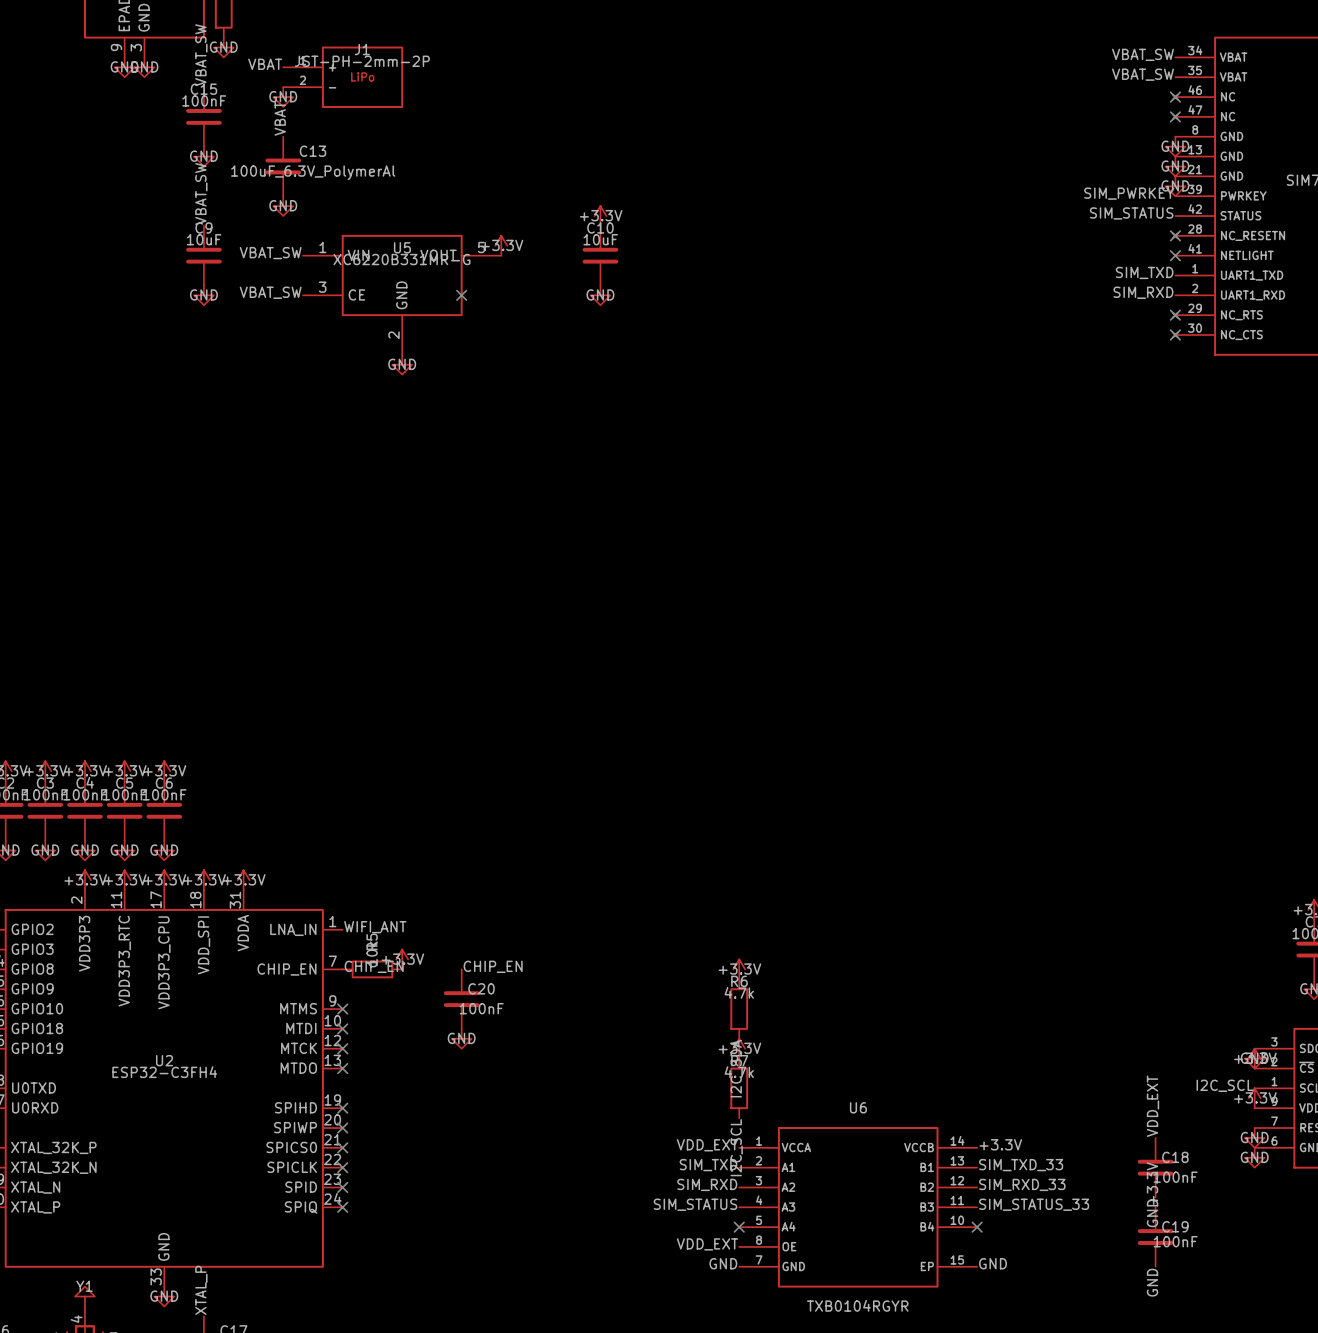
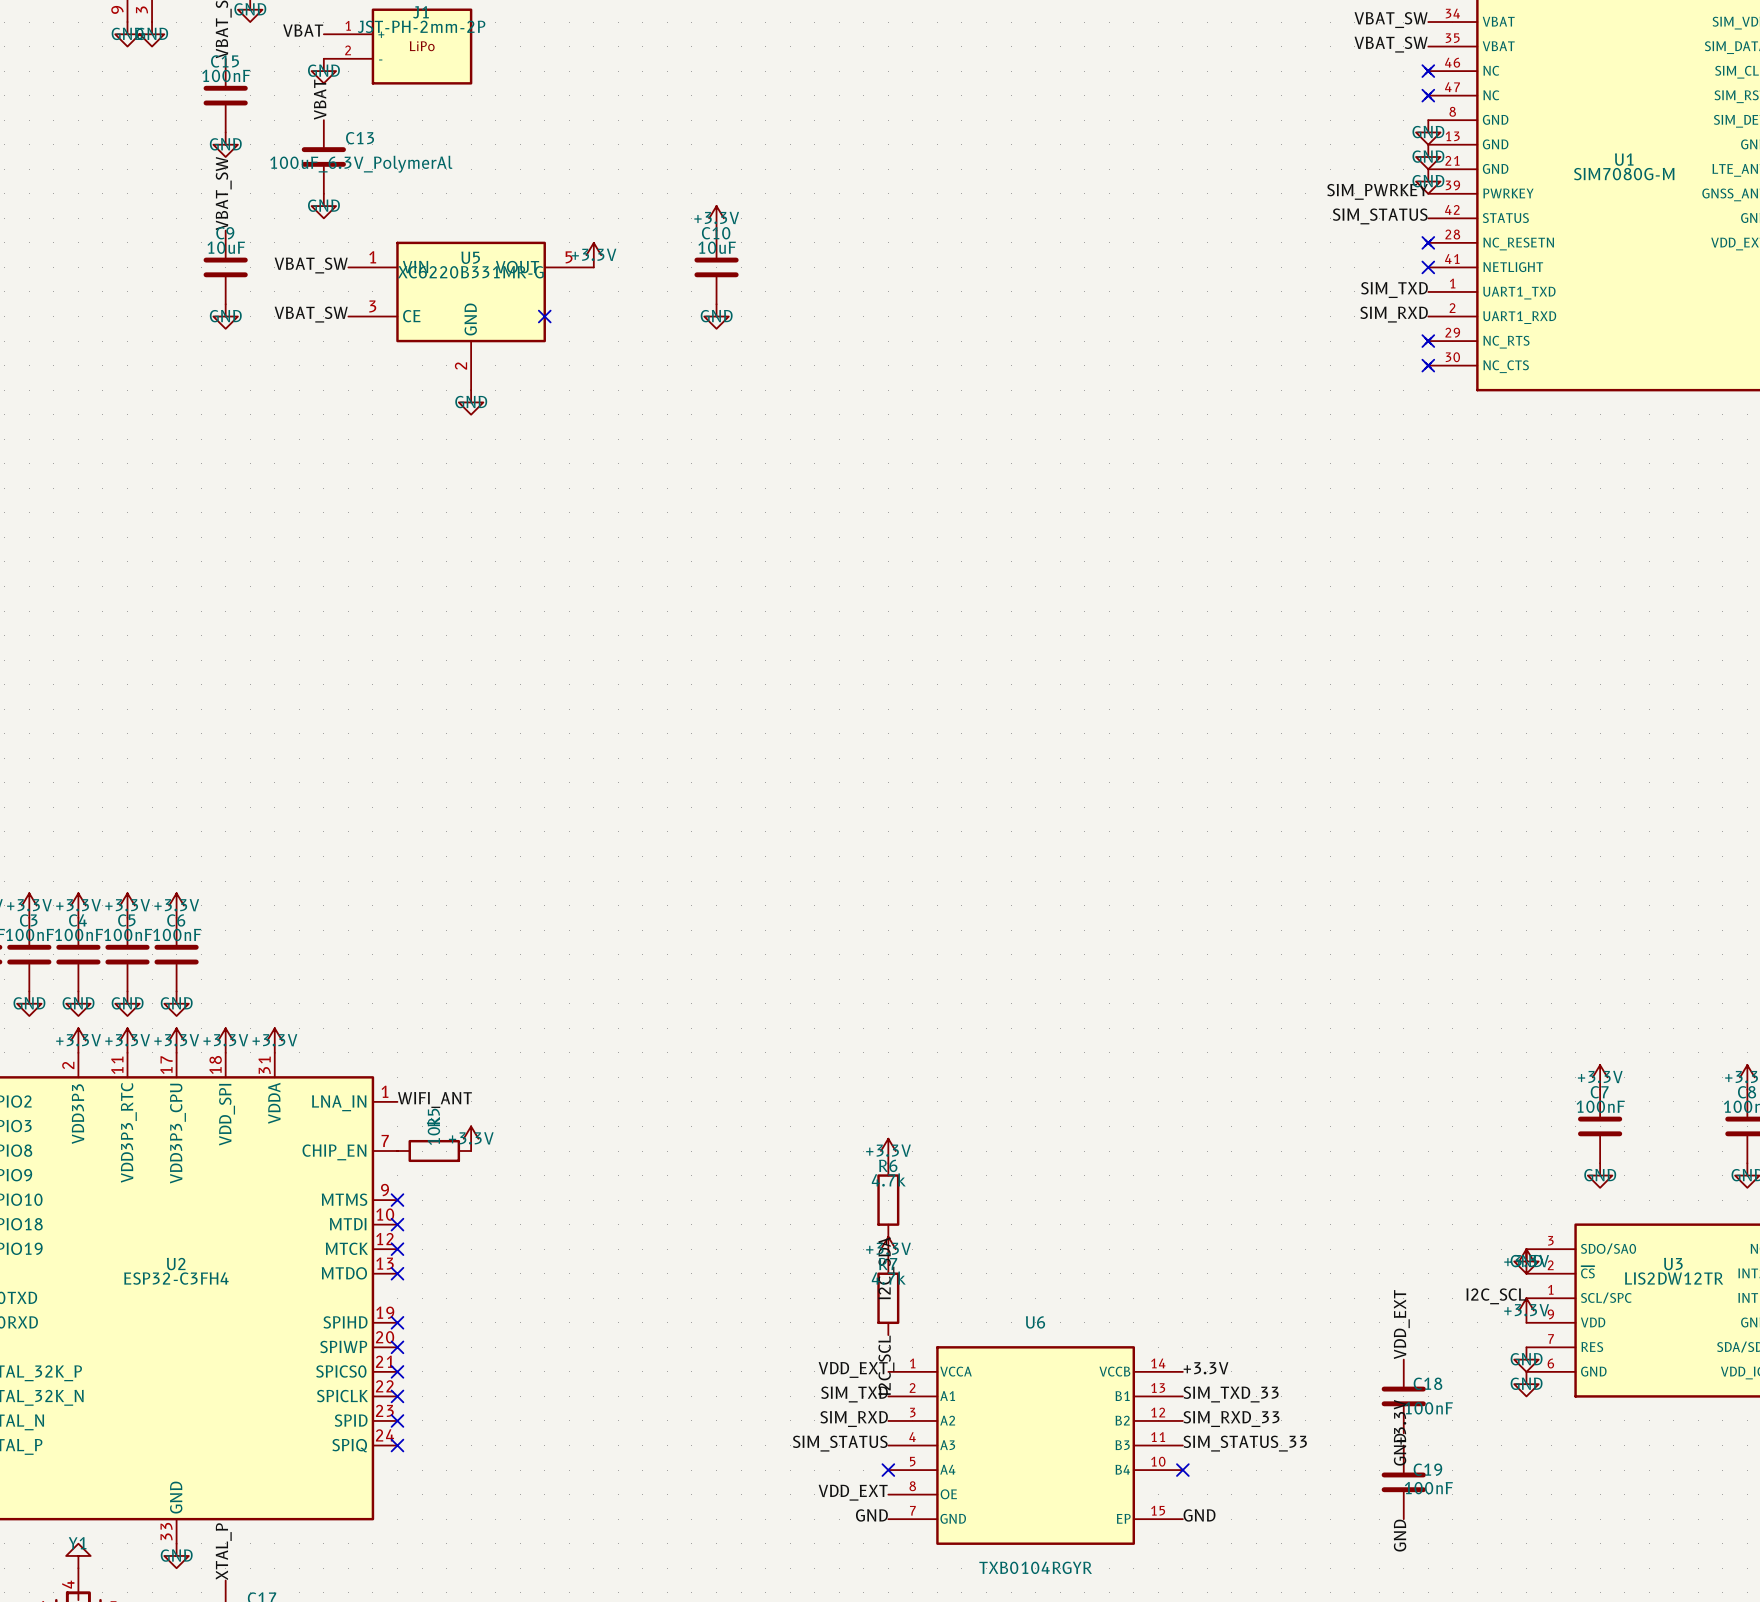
label: CHIP_EN (374, 966) -> none
label: CHIP_EN (493, 966) -> none
C20: 100nF (461, 999) -> none
power symbol: GND (461, 1038) -> none

